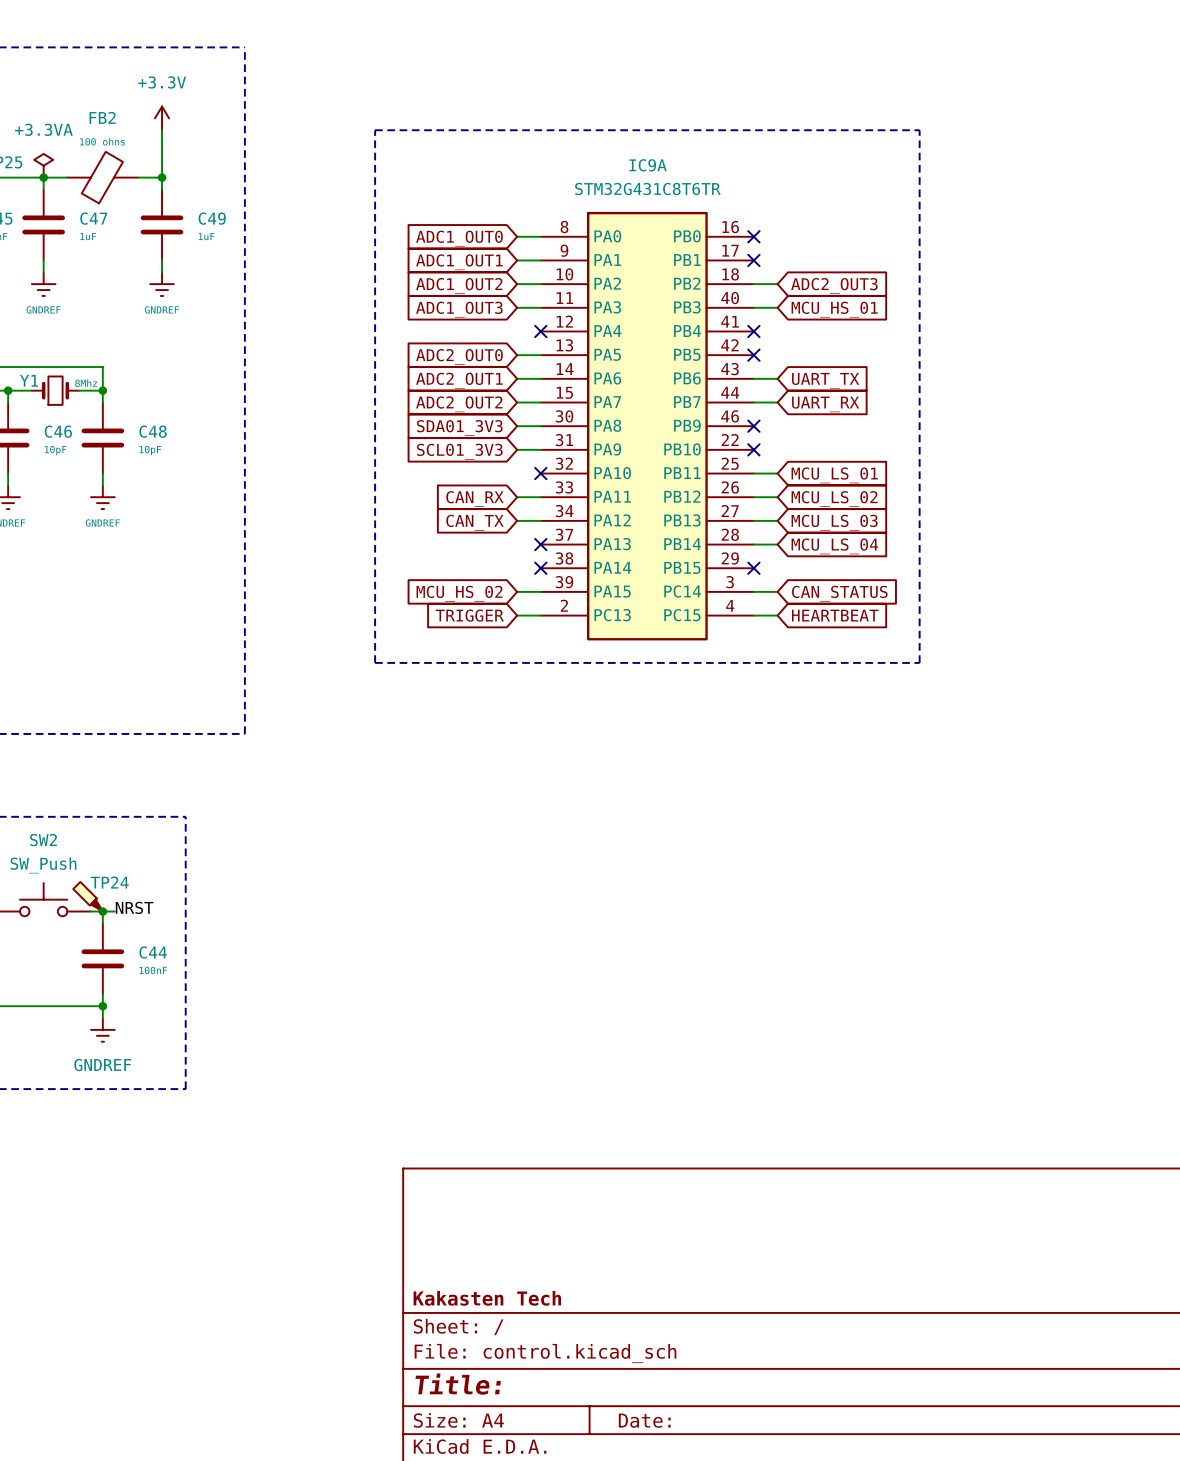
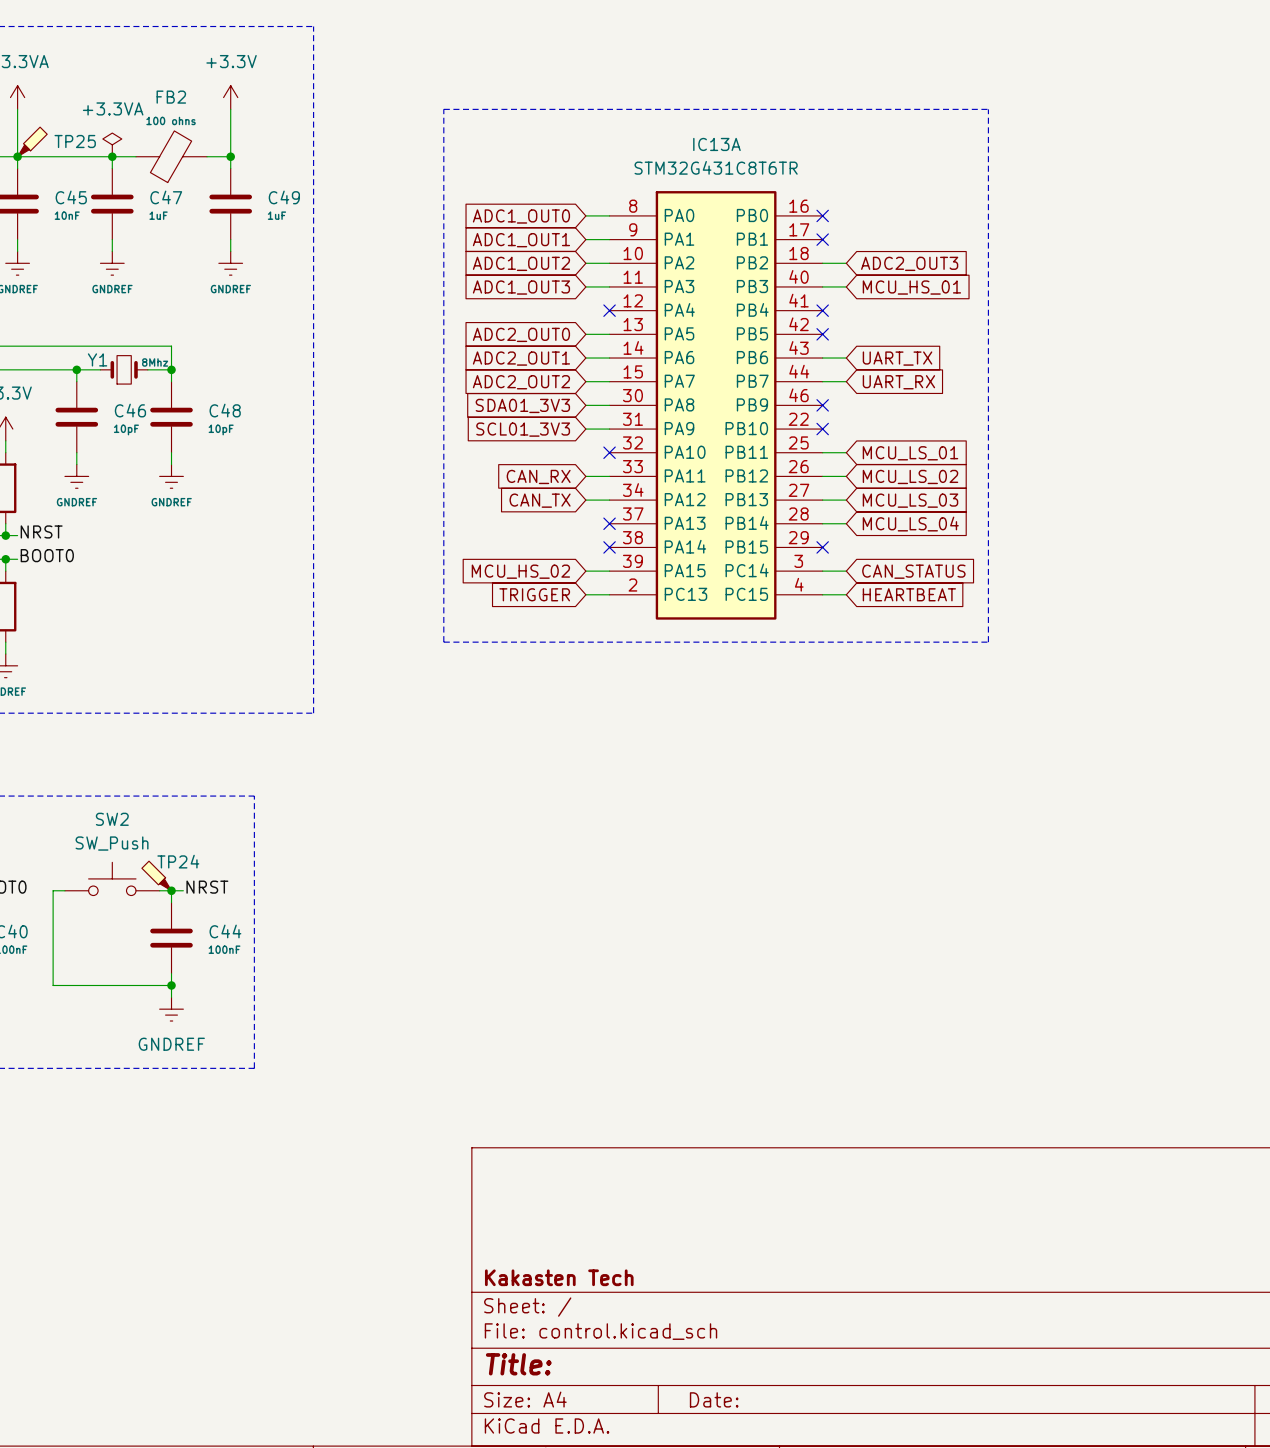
IC9A name: IC9A (648, 165) -> IC13A (716, 144)

